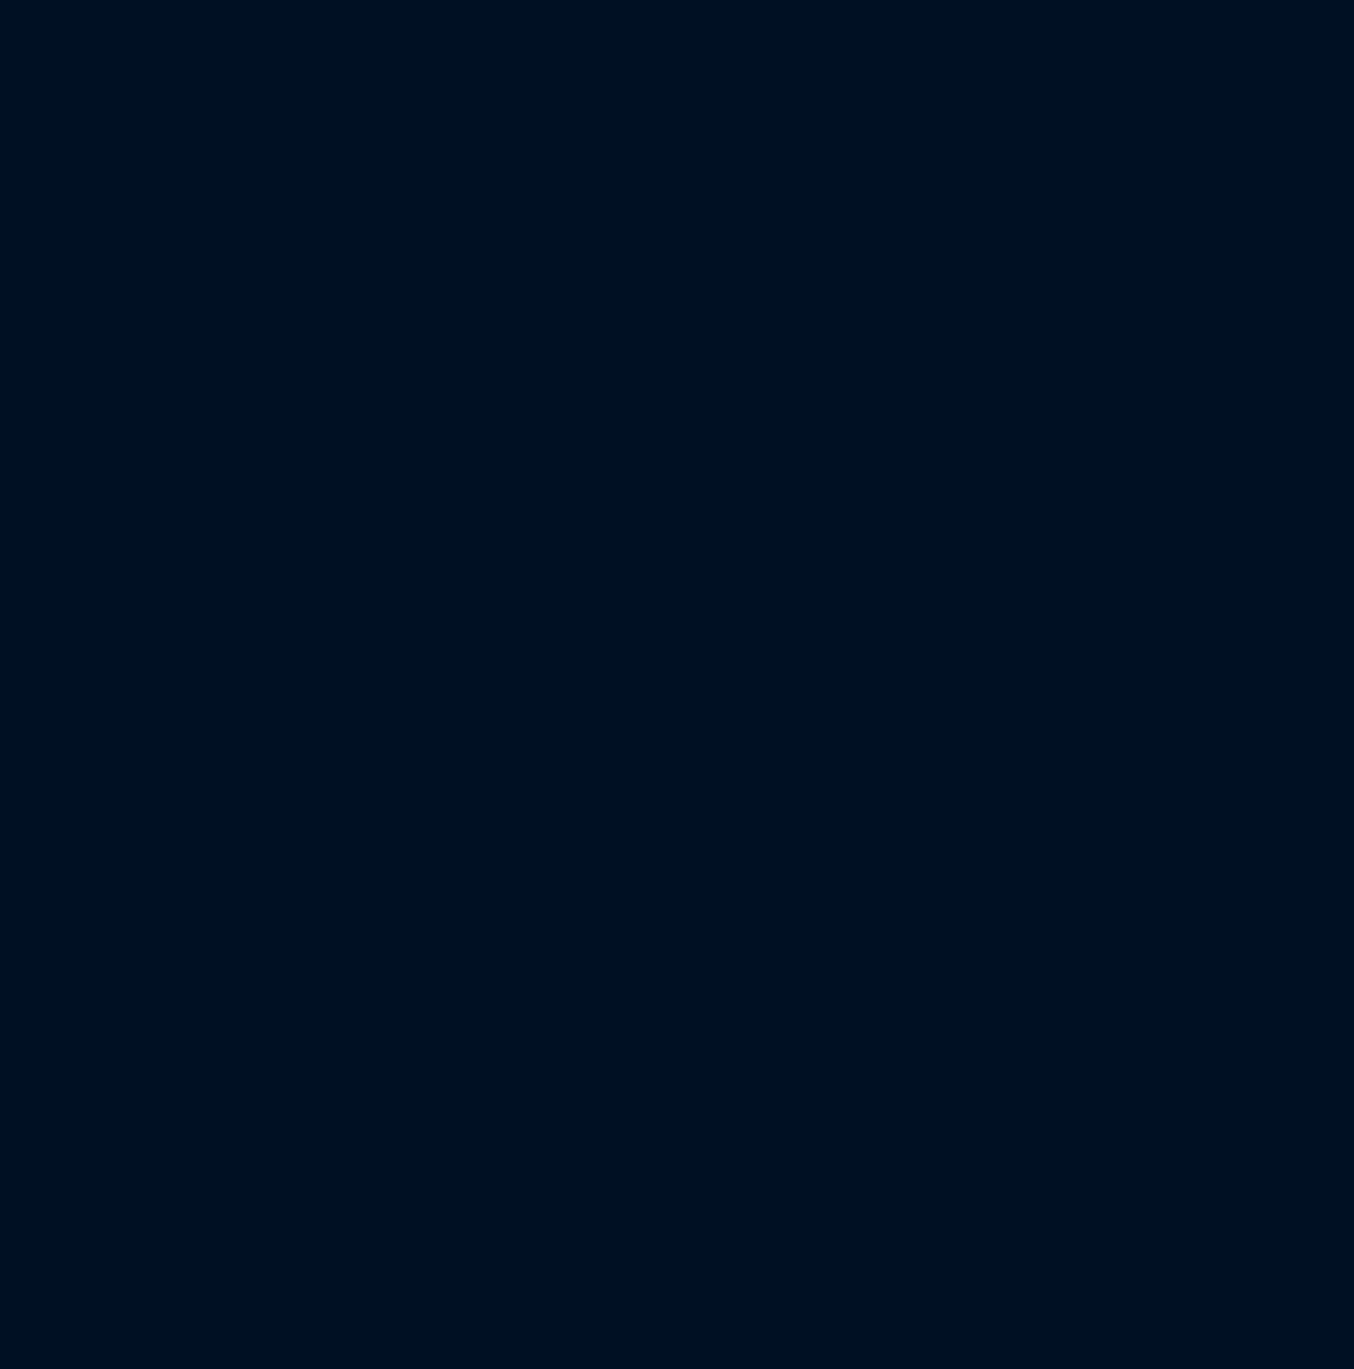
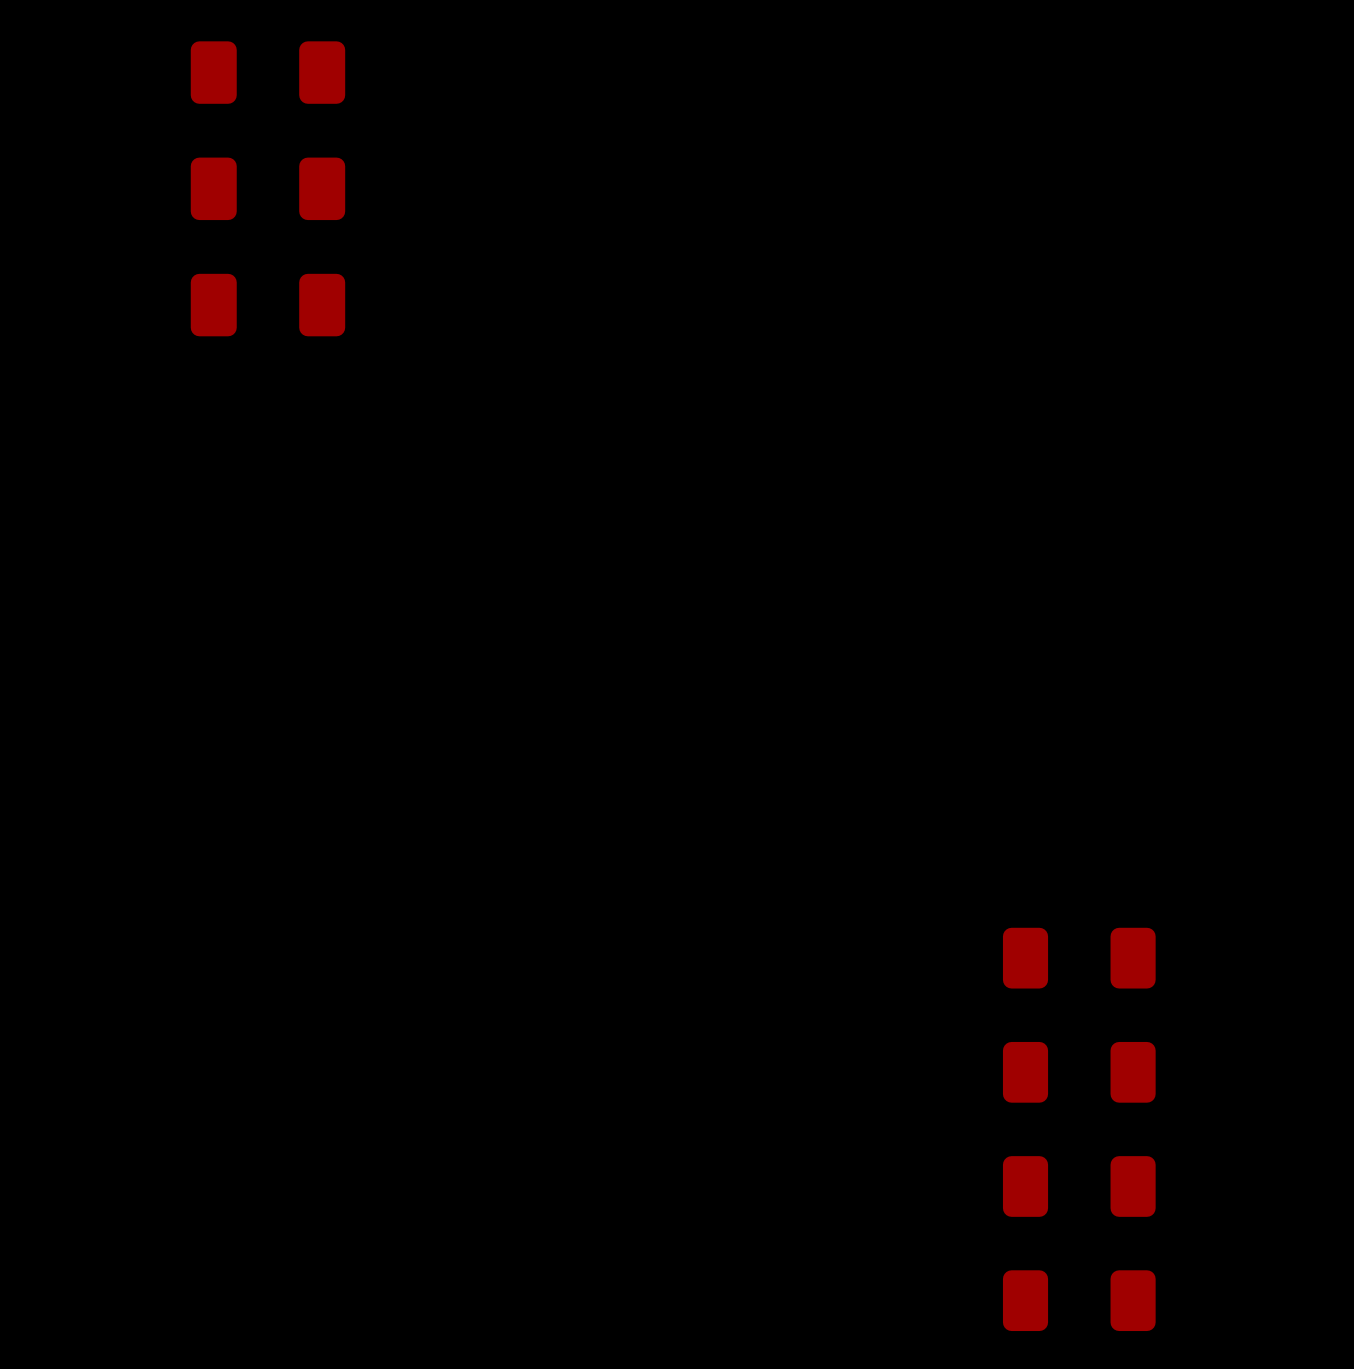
part: none -> (267, 72)
part: none -> (267, 188)
part: none -> (267, 305)
part: none -> (1079, 958)
part: none -> (1079, 1072)
part: none -> (1079, 1186)
part: none -> (1079, 1300)

